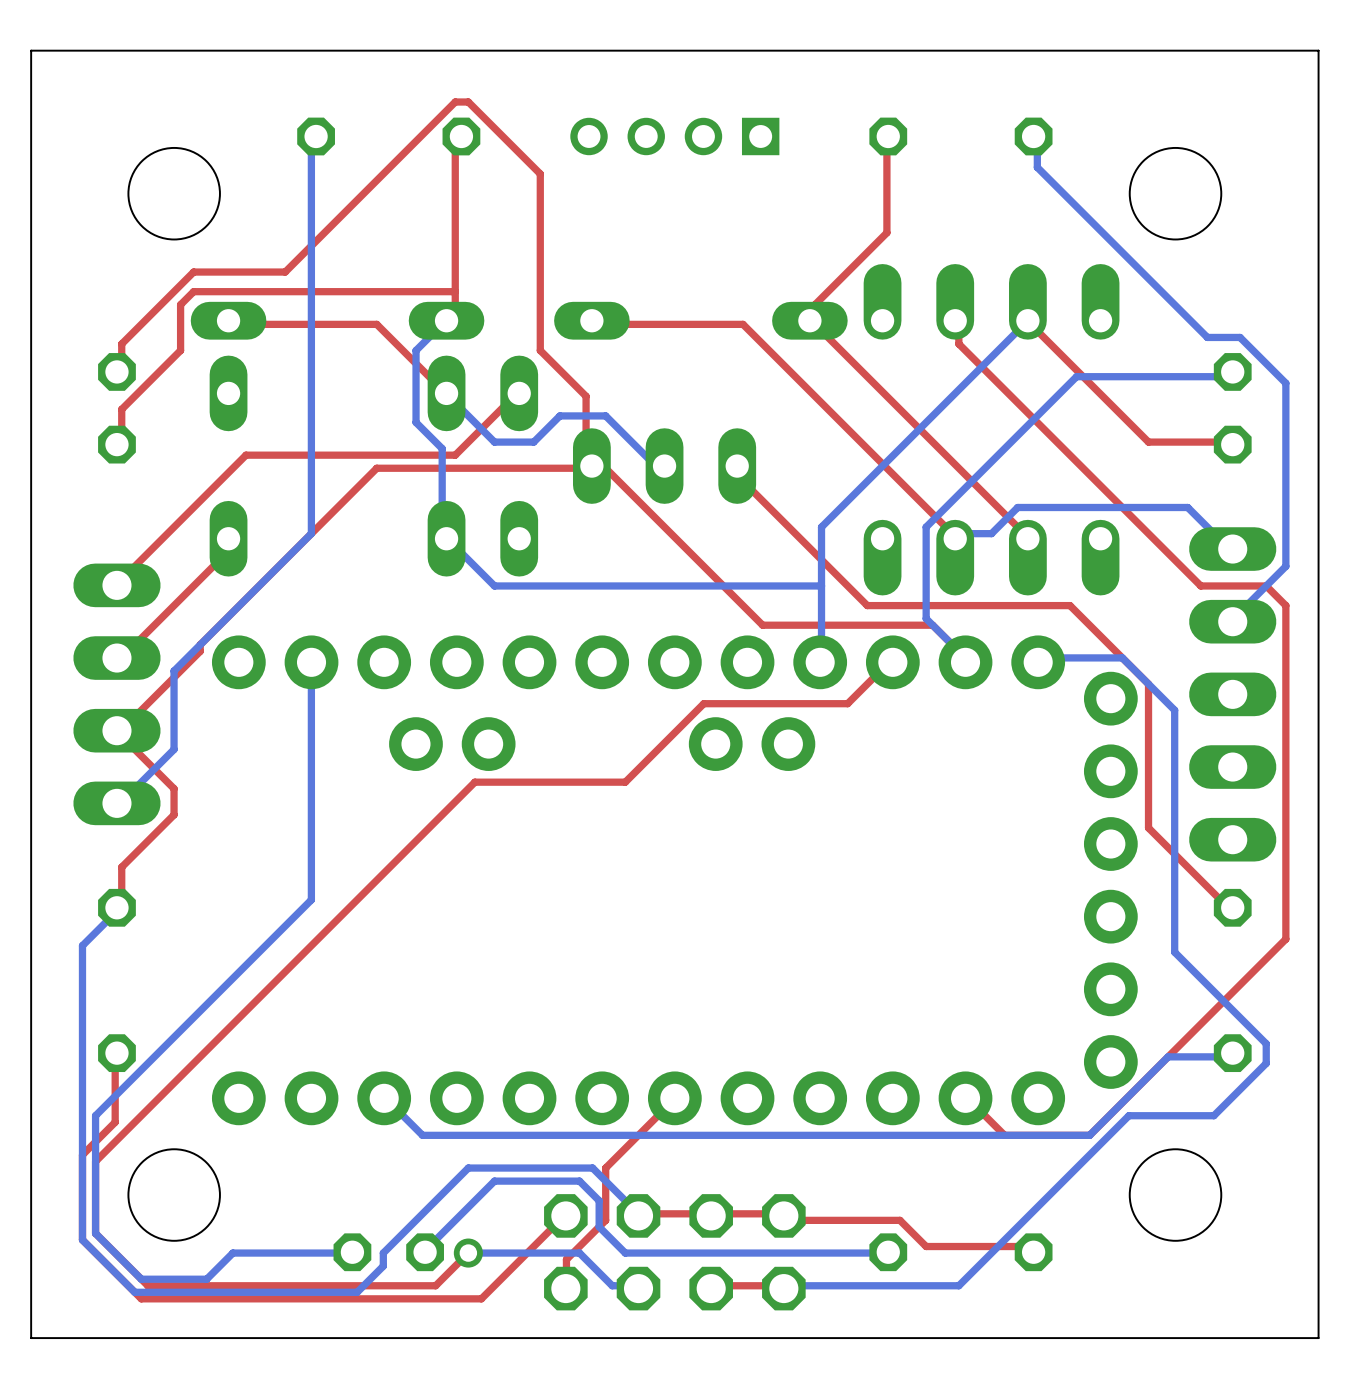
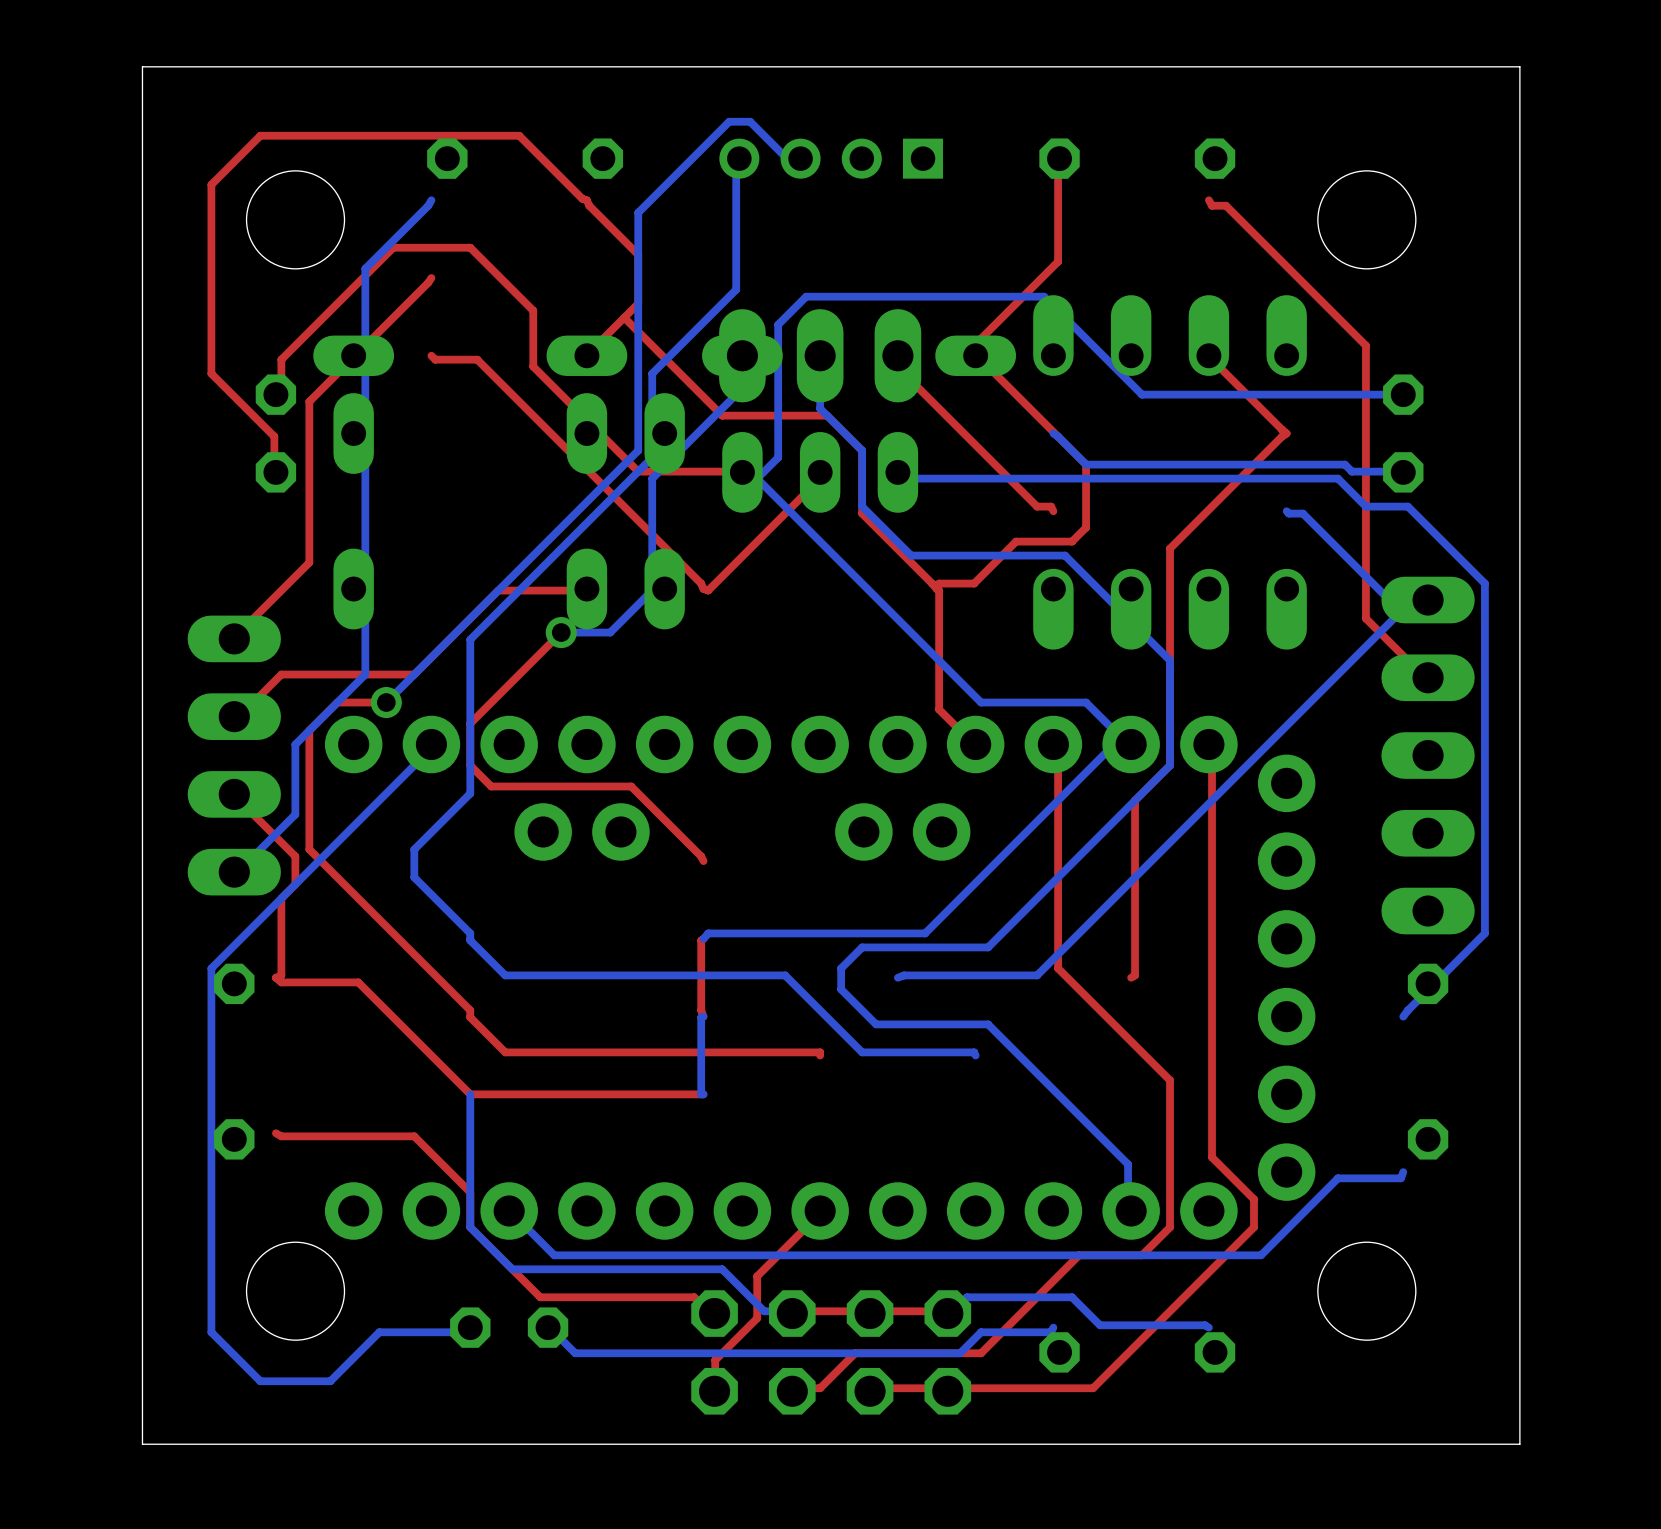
bottom track: (316, 136) (311, 141) (311, 533) (174, 670) (174, 684) -> (431, 200) (428, 205) (365, 268) (365, 674) (295, 744)
top track: (461, 136) (455, 141) (455, 311) -> (275, 472) (274, 471) (274, 436) (211, 373) (211, 184) (260, 135) (519, 135) (582, 198) (586, 200) (589, 205) (638, 254) (638, 303) (596, 345)
bottom track: none -> (739, 158) (736, 163) (736, 289) (652, 373) (652, 457) (470, 639) (470, 793) (414, 849) (414, 877) (470, 933) (470, 940) (505, 975) (785, 975) (862, 1052) (974, 1052) (975, 1055)
bottom track: none -> (800, 158) (799, 156) (785, 156) (750, 121) (729, 121) (638, 212) (638, 450) (386, 702)
bottom track: (1033, 136) (1037, 141) (1037, 167) (1207, 337) (1240, 337) (1285, 383) (1285, 533) -> (897, 472) (904, 478) (1337, 478) (1365, 506) (1407, 506) (1484, 583)
top track: none -> (1208, 200) (1212, 205) (1226, 205) (1365, 345) (1365, 618) (1421, 674) (1428, 677)
top track: none -> (624, 317) (722, 415) (827, 415) (862, 450) (862, 513) (936, 589)
top track: (455, 291) (193, 291) -> (742, 472) (638, 471) (533, 366) (533, 310) (470, 247) (393, 247) (316, 324)
top track: (180, 304) (180, 350) (121, 409) (121, 442) (116, 444) -> (302, 338) (281, 359) (281, 394) (275, 394)
top track: (228, 320) (232, 324) (304, 324) -> (431, 355) (435, 359)
bottom track: (446, 320) (416, 350) (416, 422) (442, 448) (442, 533) (494, 585) (821, 585) -> none
top track: (591, 320) (592, 324) (743, 324) (952, 533) (955, 538) -> none
bottom track: none -> (742, 355) (736, 359) (736, 394) (652, 478) (652, 590) (610, 632) (561, 632)
bottom track: none -> (820, 355) (820, 408) (862, 450) (862, 506) (911, 555) (1065, 555) (1170, 660) (1170, 765) (988, 947) (862, 947) (841, 968) (841, 989) (876, 1024) (988, 1024) (1128, 1164) (1128, 1206) (1131, 1210)
part: none -> (820, 355)
top track: none -> (897, 355) (904, 359) (904, 373) (1037, 506) (1051, 506) (1053, 511)
top track: (955, 320) (958, 324) (958, 343) (1200, 585) (1266, 585) (1285, 605) (1285, 939) (1089, 1135) (1004, 1135) (965, 1098) -> none
bottom track: (1027, 320) (821, 527) (820, 662) -> none
top track: (344, 324) (376, 324) (446, 393) -> (477, 359) (701, 583) (703, 589) (708, 590) (820, 478) (820, 472)
bottom track: none -> (1403, 394) (1142, 394) (1044, 296) (806, 296) (778, 324) (778, 457) (757, 478)
top track: (116, 371) (121, 370) (121, 343) (193, 272) (285, 272) (455, 102) (468, 102) (540, 173) (540, 350) (586, 396) (586, 461) (591, 466) -> none
bottom track: (1232, 371) (1227, 376) (1076, 376) (926, 527) (926, 618) (965, 657) (965, 662) -> none
top track: (1096, 389) (1148, 442) (1227, 442) (1232, 444) -> (1281, 429) (1286, 433) (1170, 548) (1170, 765) (1135, 800) (1135, 975) (1131, 977)
bottom track: (446, 393) (494, 442) (533, 442) (559, 415) (605, 415) (651, 461) (664, 461) (664, 466) -> none
top track: (519, 393) (455, 455) (245, 455) (187, 514) -> (431, 278) (309, 401) (309, 562)
bottom track: none -> (1053, 433) (1086, 464) (1344, 464) (1351, 471) (1403, 472)
part position: (116, 408) -> (275, 433)
part position: (1232, 408) -> (1403, 433)
top track: (913, 422) (1027, 538) -> (1086, 464) (1086, 527) (1072, 541) (1016, 541) (974, 583) (939, 583) (936, 589)
bottom track: none -> (757, 478) (981, 702) (1086, 702) (1128, 744) (1131, 744) (1121, 737) (925, 933) (708, 933) (703, 938)
top track: (591, 466) (592, 468) (605, 468) (762, 625) (932, 625) (965, 657) (965, 662) -> none
top track: (591, 466) (586, 468) (376, 468) (200, 644) (200, 651) (121, 729) (116, 730) -> none
part position: (664, 466) -> (820, 472)
top track: (737, 466) (743, 468) (743, 481) (867, 605) (1070, 605) (1148, 684) (1148, 827) (1227, 906) (1232, 907) -> none
bottom track: none -> (1286, 511) (1288, 513) (1302, 513) (1400, 611) (1428, 600) (1421, 604) (1407, 604) (1037, 975) (904, 975) (897, 977)
top track: (228, 538) (226, 540) (226, 553) (160, 618) -> (586, 589) (498, 590) (414, 674) (281, 674)
top track: none -> (936, 589) (939, 590) (939, 709) (975, 744)
bottom track: (955, 538) (958, 533) (991, 533) (1017, 507) (1187, 507) (1227, 546) (1232, 549) -> none
bottom track: (1285, 566) (1233, 618) (1232, 621) -> (1484, 618) (1484, 933) (1403, 1016)
top track: none -> (561, 632) (470, 723) (470, 765) (491, 786) (631, 786) (701, 856) (703, 861)
via: none -> (561, 632)
top track: none -> (386, 702) (337, 702) (309, 730) (309, 849) (470, 1010) (470, 1017) (505, 1052) (820, 1052) (820, 1055)
via: none -> (386, 702)
bottom track: (311, 662) (311, 899) (95, 1115) -> (431, 744) (435, 744) (211, 968) (211, 1206)
top track: (892, 662) (886, 664) (847, 703) (703, 703) (625, 782) (474, 782) (95, 1161) (95, 1233) (147, 1285) (435, 1285) (468, 1253) -> none
bottom track: (1038, 662) (1043, 657) (1122, 657) (1174, 710) (1174, 952) (1266, 1043) (1266, 1063) (1213, 1115) (1128, 1115) (958, 1285) (788, 1285) (783, 1288) -> none
top track: none -> (1053, 744) (1058, 744) (1058, 968) (1170, 1080) (1170, 1227) (1142, 1255) (1079, 1255) (981, 1353) (855, 1353) (820, 1388) (799, 1388) (792, 1391)
top track: none -> (1208, 744) (1212, 744) (1212, 1157) (1254, 1199) (1254, 1227) (1093, 1388) (953, 1388) (947, 1391)
top track: (160, 827) (121, 867) (121, 906) (116, 907) -> (281, 898) (281, 975) (275, 977) (281, 982) (358, 982) (470, 1094) (703, 1094)
top track: none -> (703, 938) (701, 940) (701, 1010) (703, 1016)
part position: (674, 880) -> (820, 977)
bottom track: (116, 907) (115, 912) (82, 945) (82, 1239) (134, 1292) (357, 1292) (383, 1266) (383, 1253) (468, 1168) (592, 1168) (638, 1213) -> none
bottom track: none -> (703, 1016) (701, 1017) (701, 1094) (703, 1094)
top track: (116, 1053) (115, 1056) (115, 1122) (82, 1154) (82, 1239) (141, 1298) (481, 1298) (565, 1215) -> (275, 1133) (281, 1136) (414, 1136) (470, 1192) (470, 1227) (540, 1297) (694, 1297) (708, 1311) (714, 1313)
bottom track: (1232, 1053) (1227, 1056) (1168, 1056) (1089, 1135) (422, 1135) (384, 1098) -> none
bottom track: none -> (1403, 1172) (1400, 1178) (1337, 1178) (1260, 1255) (554, 1255) (509, 1210)
top track: (674, 1098) (605, 1168) (605, 1181) -> (820, 1210) (820, 1213) (757, 1276)
bottom track: (579, 1181) (494, 1181) (425, 1252) -> (729, 1276) (722, 1269) (512, 1269) (470, 1227) (470, 1094)
bottom track: (599, 1200) (599, 1226) (625, 1253) -> (750, 1297) (764, 1311) (792, 1311)
top track: (783, 1215) (788, 1220) (899, 1220) (926, 1246) (1030, 1246) (1033, 1252) -> none
bottom track: none -> (947, 1313) (953, 1311) (967, 1297) (1072, 1297) (1100, 1325) (1205, 1325) (1208, 1327)
bottom track: none -> (548, 1327) (575, 1353) (610, 1353)
bottom track: (352, 1252) (232, 1253) -> (470, 1327) (470, 1332) (379, 1332) (358, 1353)
part position: (388, 1252) -> (509, 1327)
bottom track: (888, 1252) (795, 1253) -> (1053, 1327) (1051, 1332) (981, 1332) (960, 1353)
via: (468, 1253) -> none
bottom track: (579, 1253) (612, 1285) (638, 1285) (638, 1288) -> (729, 1353) (778, 1353)

